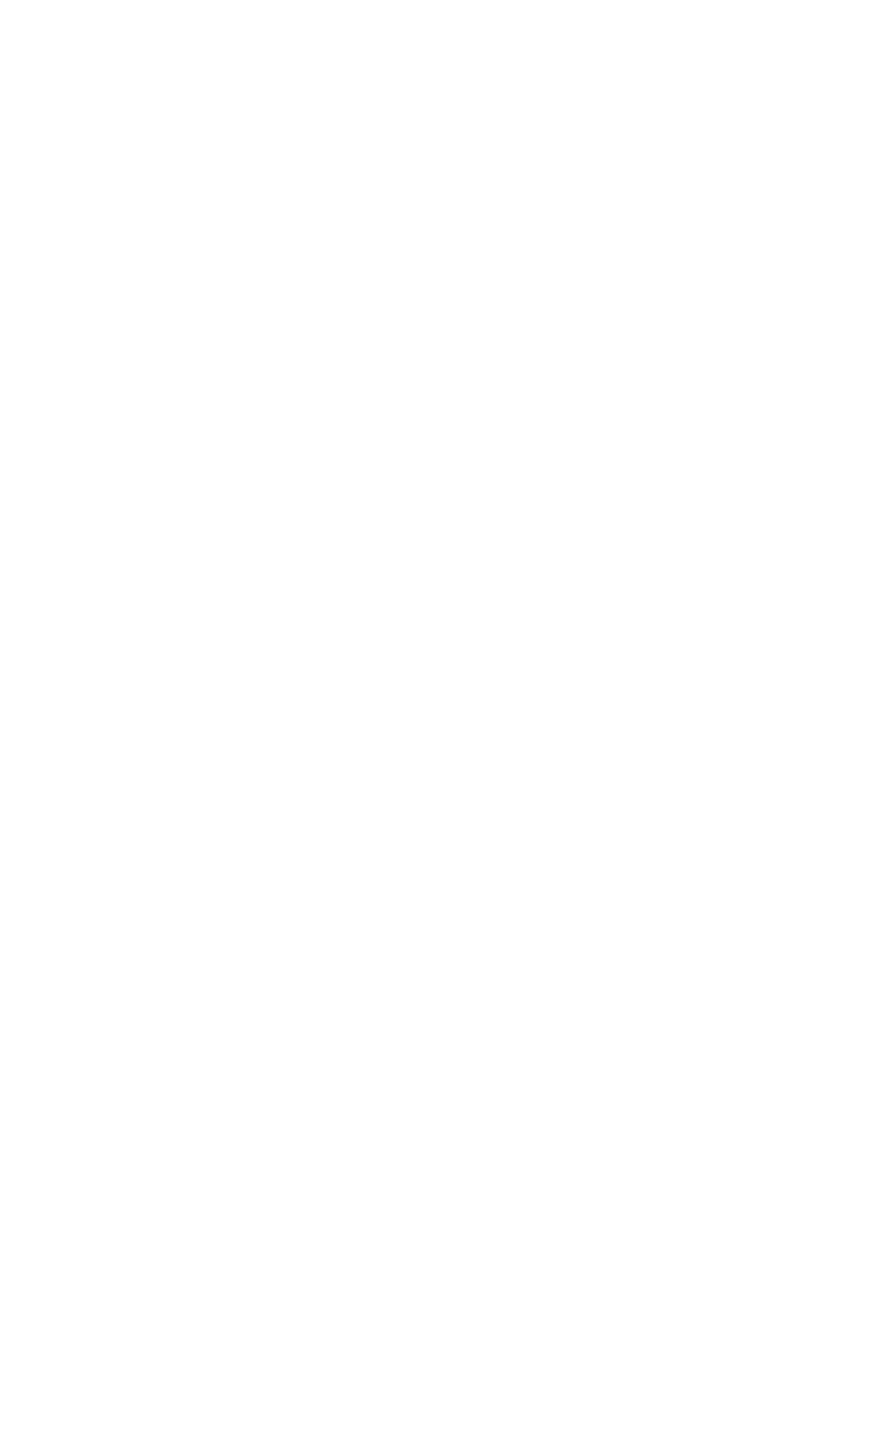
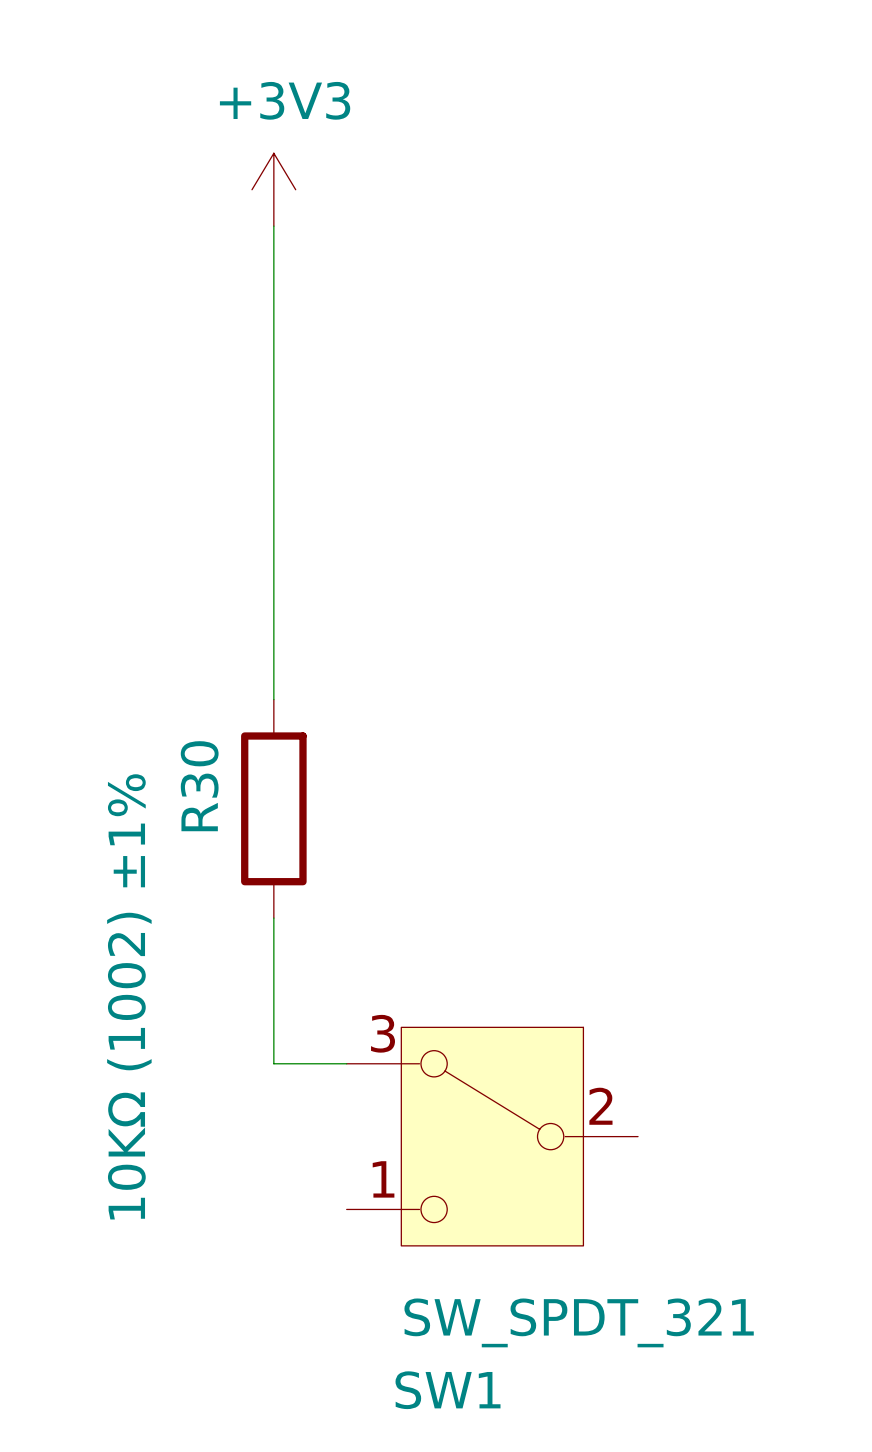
power symbol: none -> +3V3 (273, 189)
wire: none -> (273, 226) (273, 699)
R30: none -> 10KΩ (1002) ±1% (273, 808)
wire: none -> (273, 918) (273, 1063) (346, 1063)
SW1: none -> SW_SPDT_321 (492, 1136)

